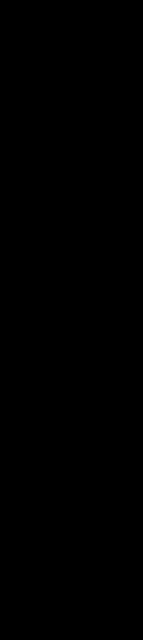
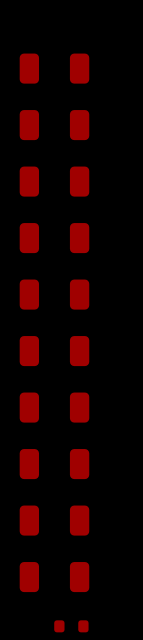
part: none -> (54, 68)
part: none -> (54, 125)
part: none -> (54, 181)
part: none -> (54, 238)
part: none -> (54, 294)
part: none -> (54, 351)
part: none -> (54, 407)
part: none -> (54, 464)
part: none -> (54, 520)
part: none -> (54, 577)
part: none -> (71, 626)

